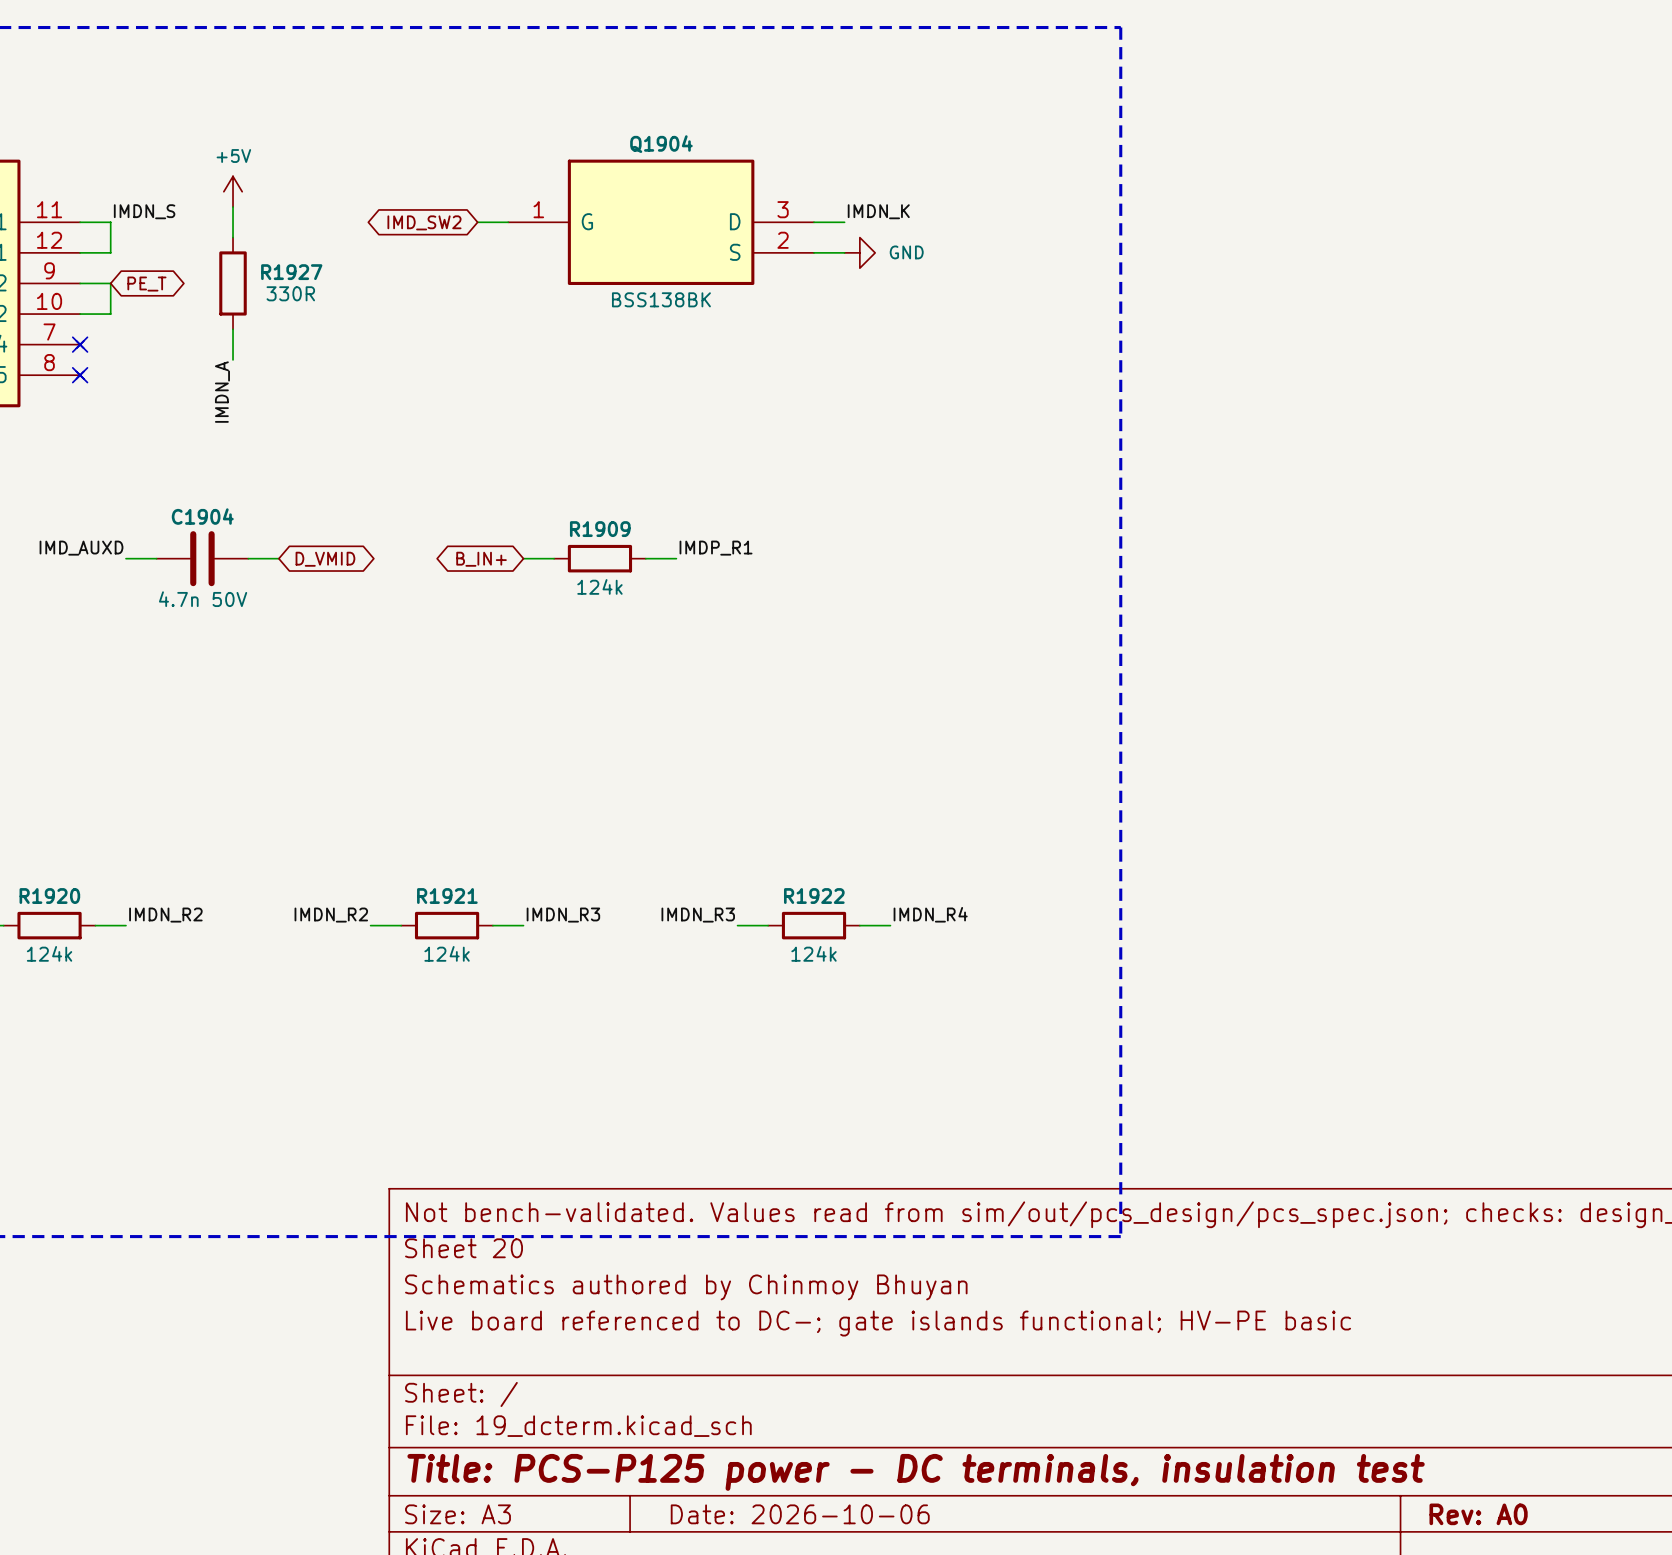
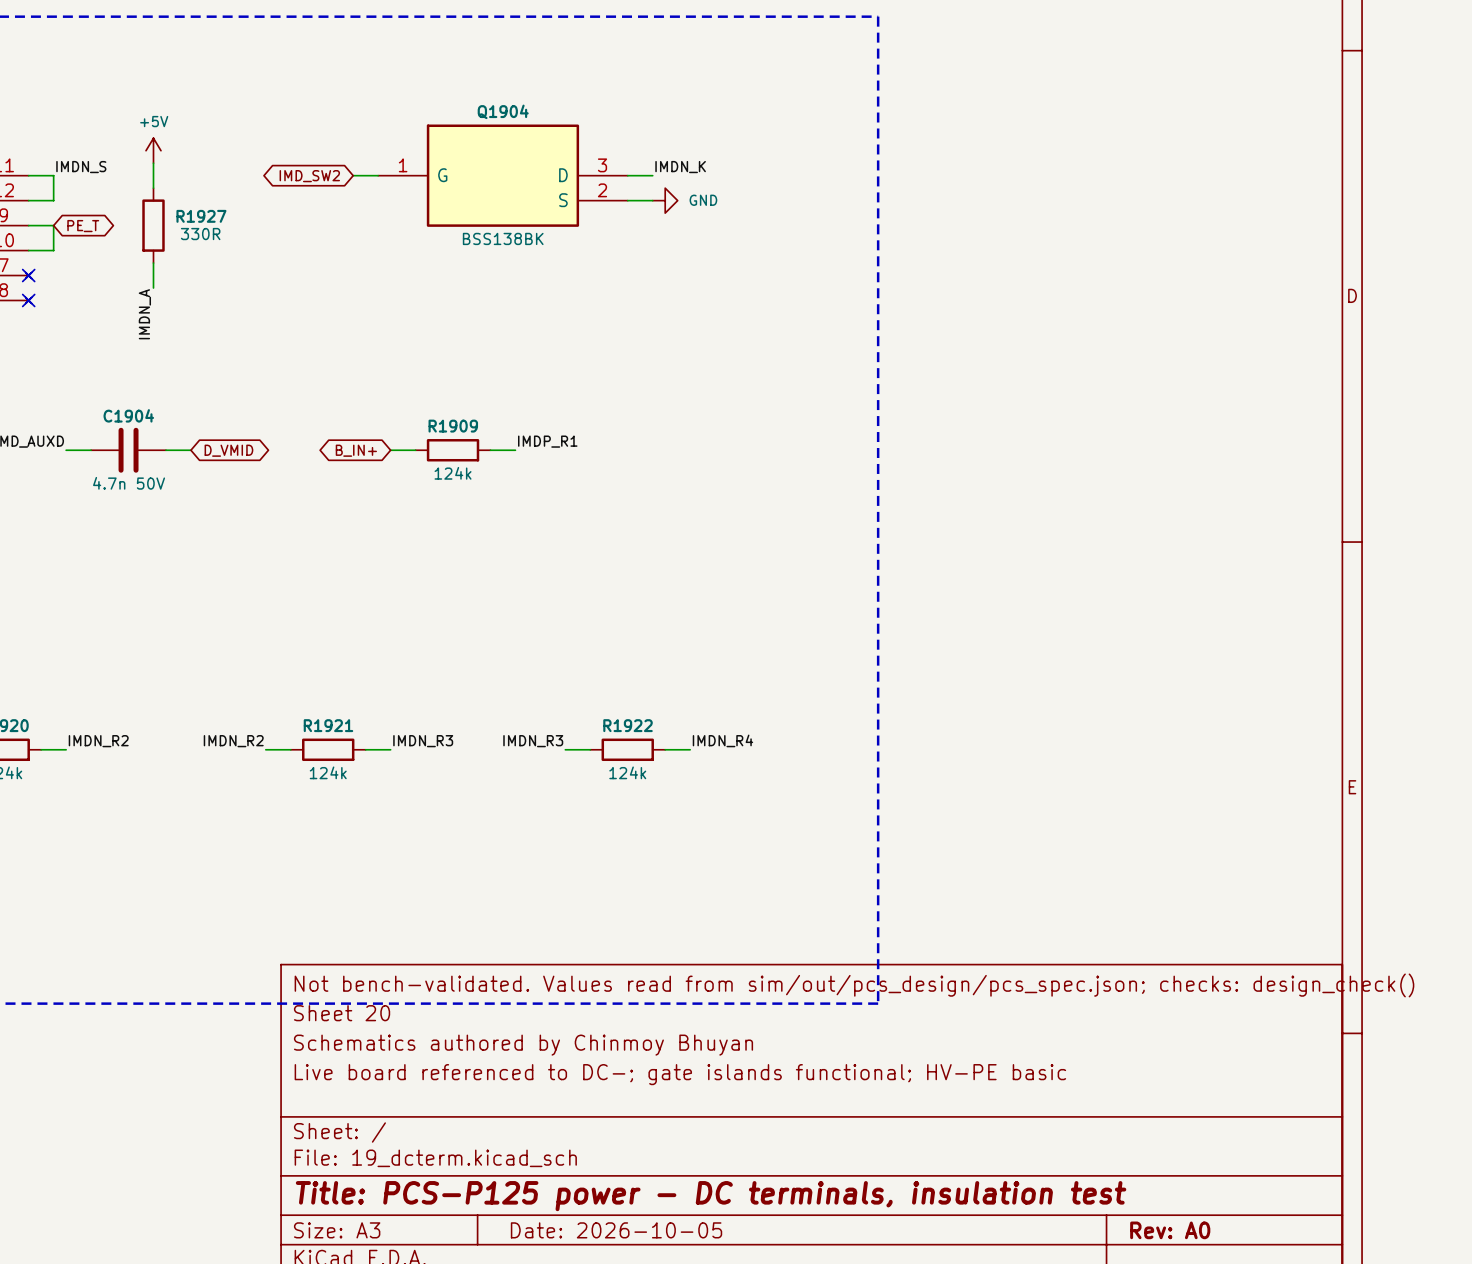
title block: Date: 2026-10-06 (800, 1514) -> Date: 2026-10-05 (616, 1230)

